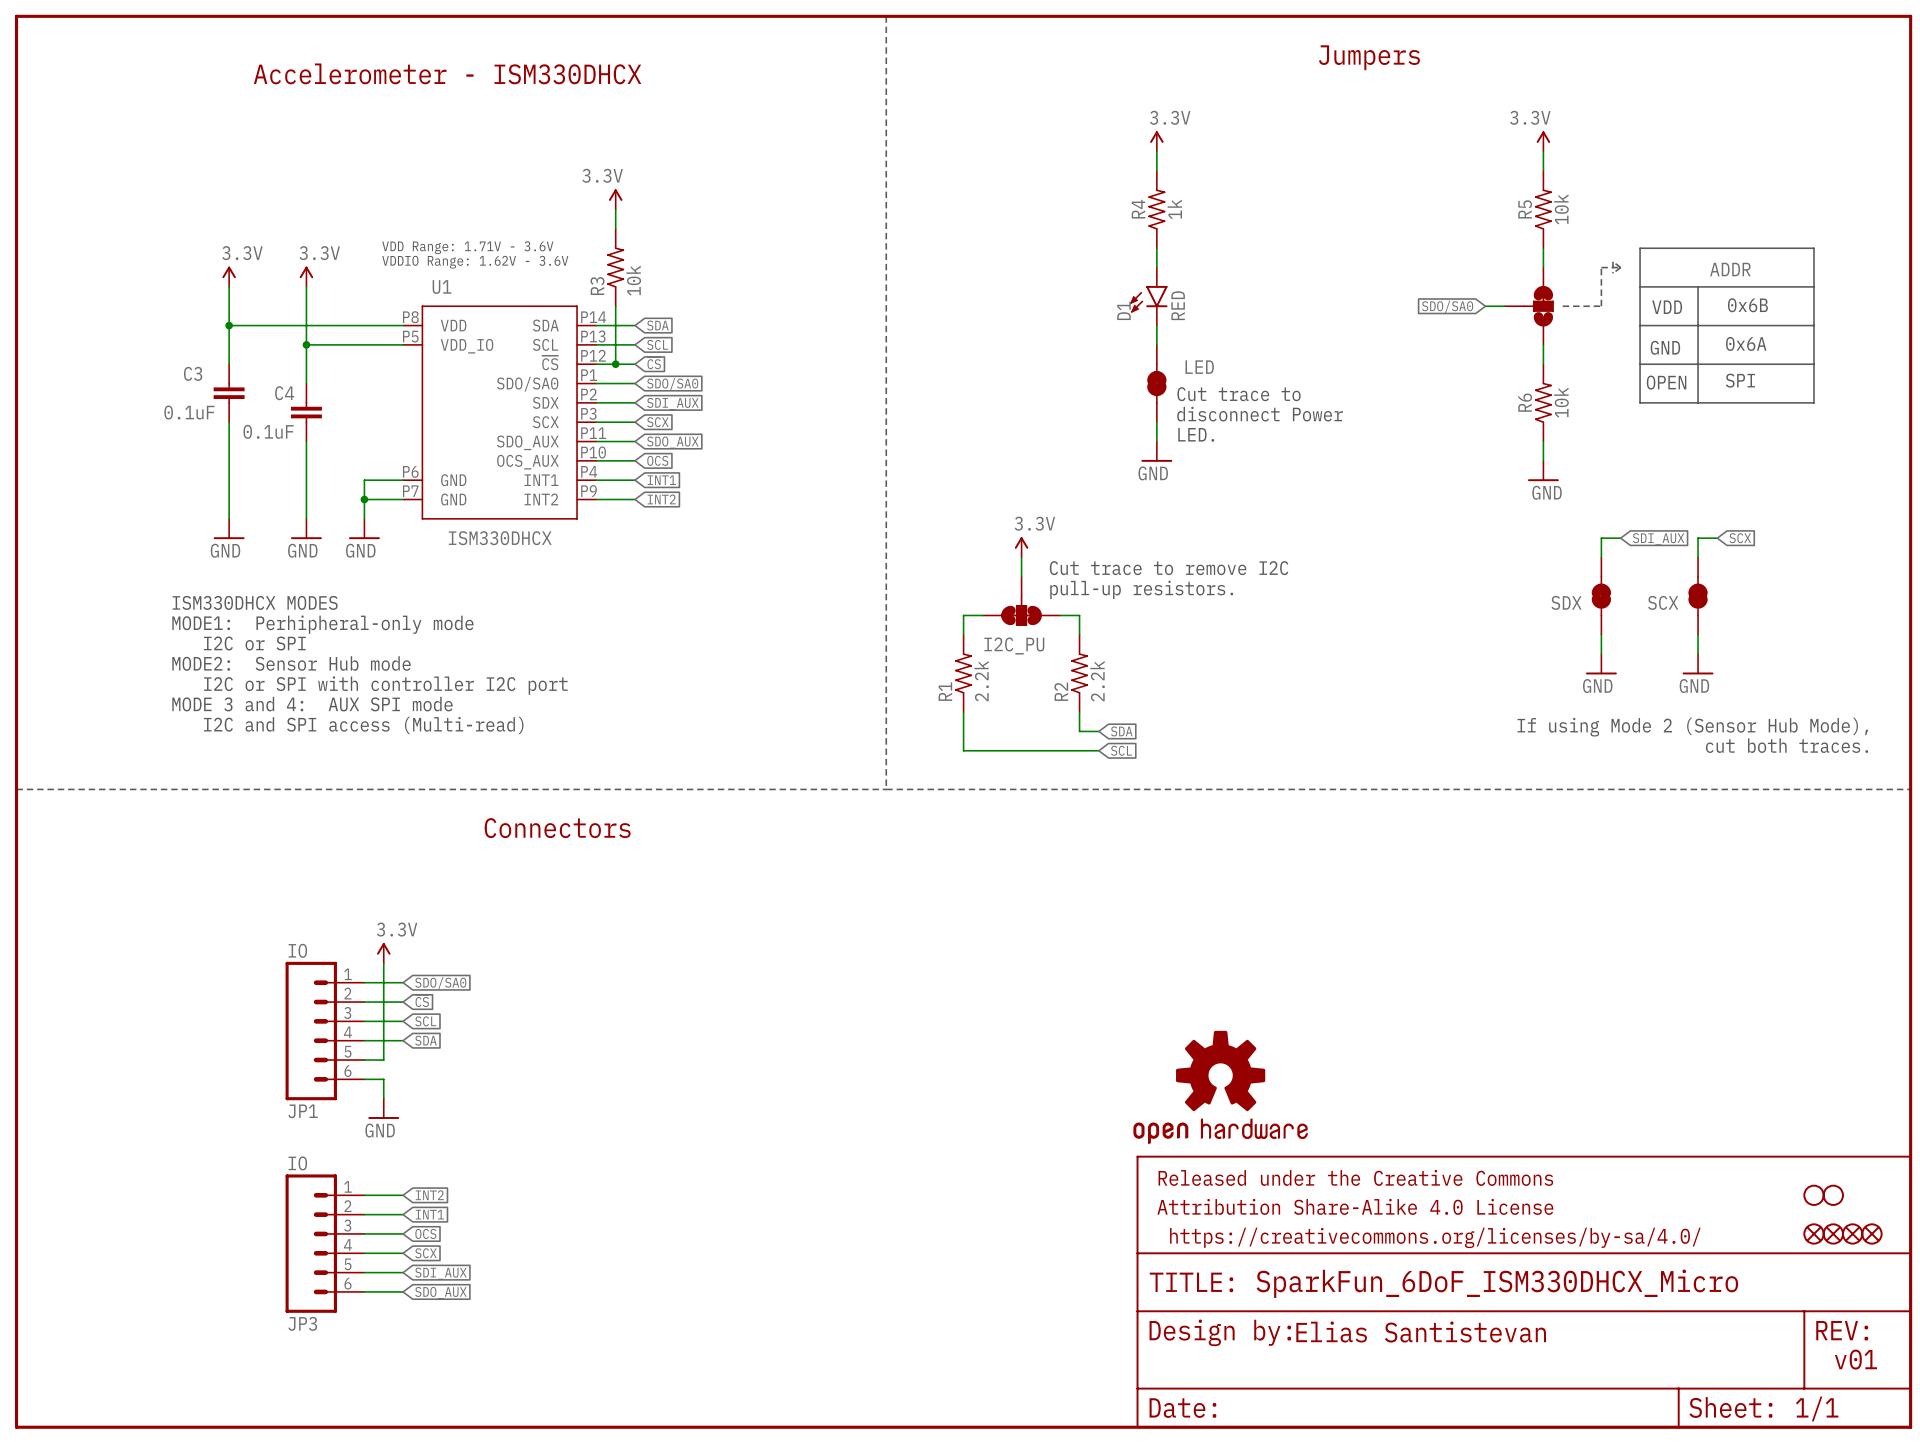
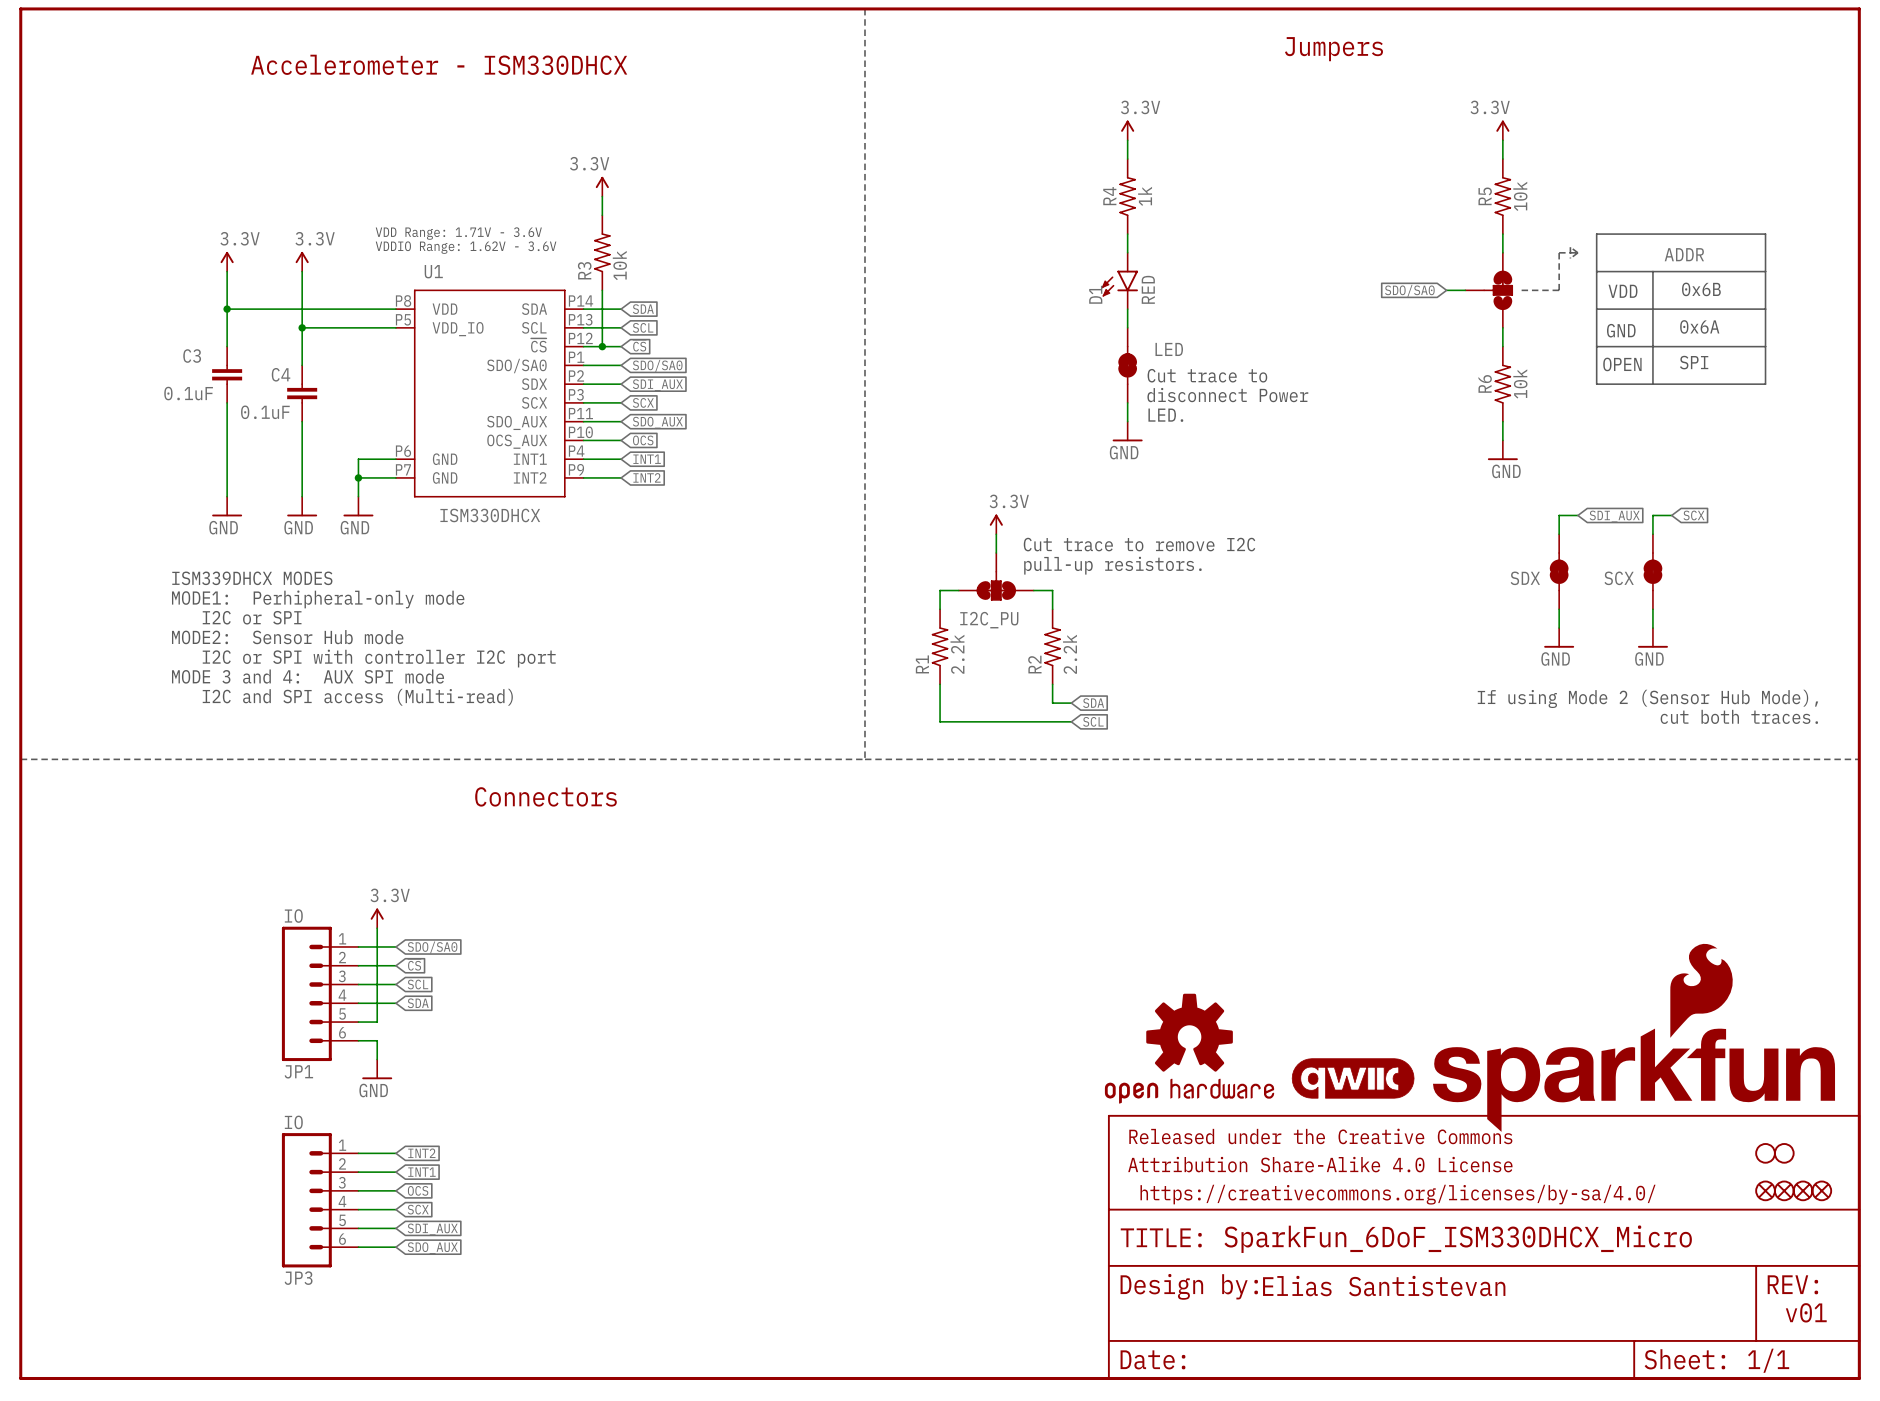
text: ISM330DHCX MODES (255, 602) -> ISM339DHCX MODES (252, 578)
part: none -> (1634, 1037)
part: none -> (1353, 1078)

